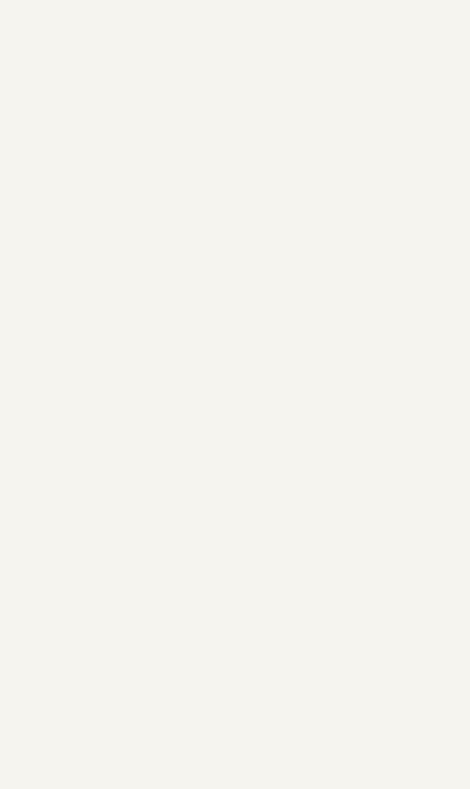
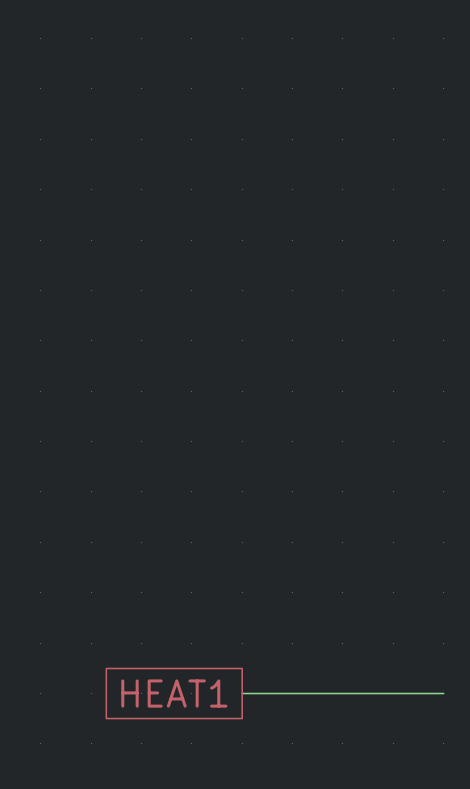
global label: none -> HEAT1 (174, 693)
wire: none -> (242, 693) (443, 693)

